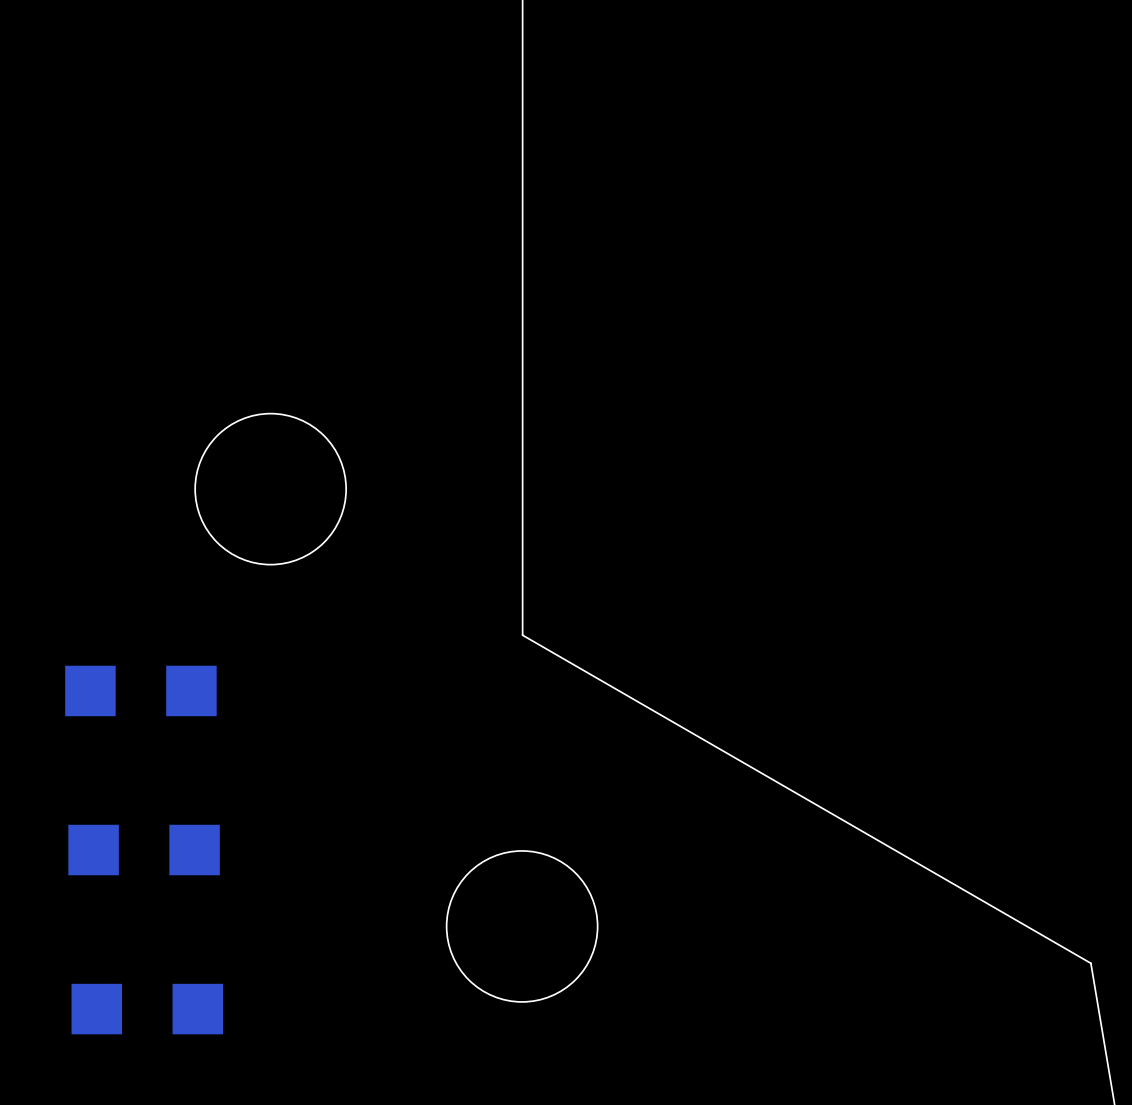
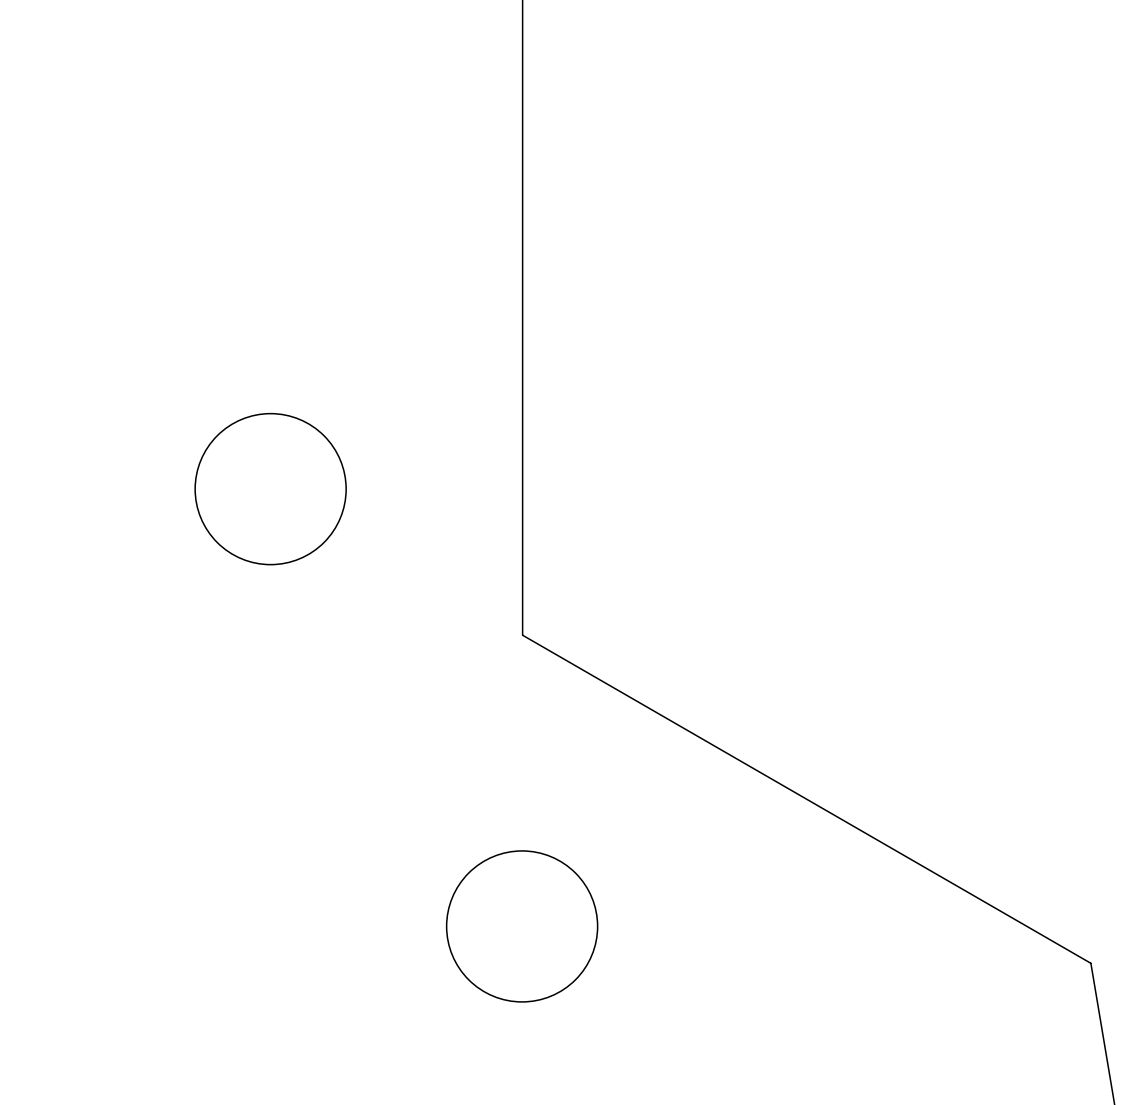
part: (140, 690) -> none
part: (144, 850) -> none
part: (147, 1009) -> none

